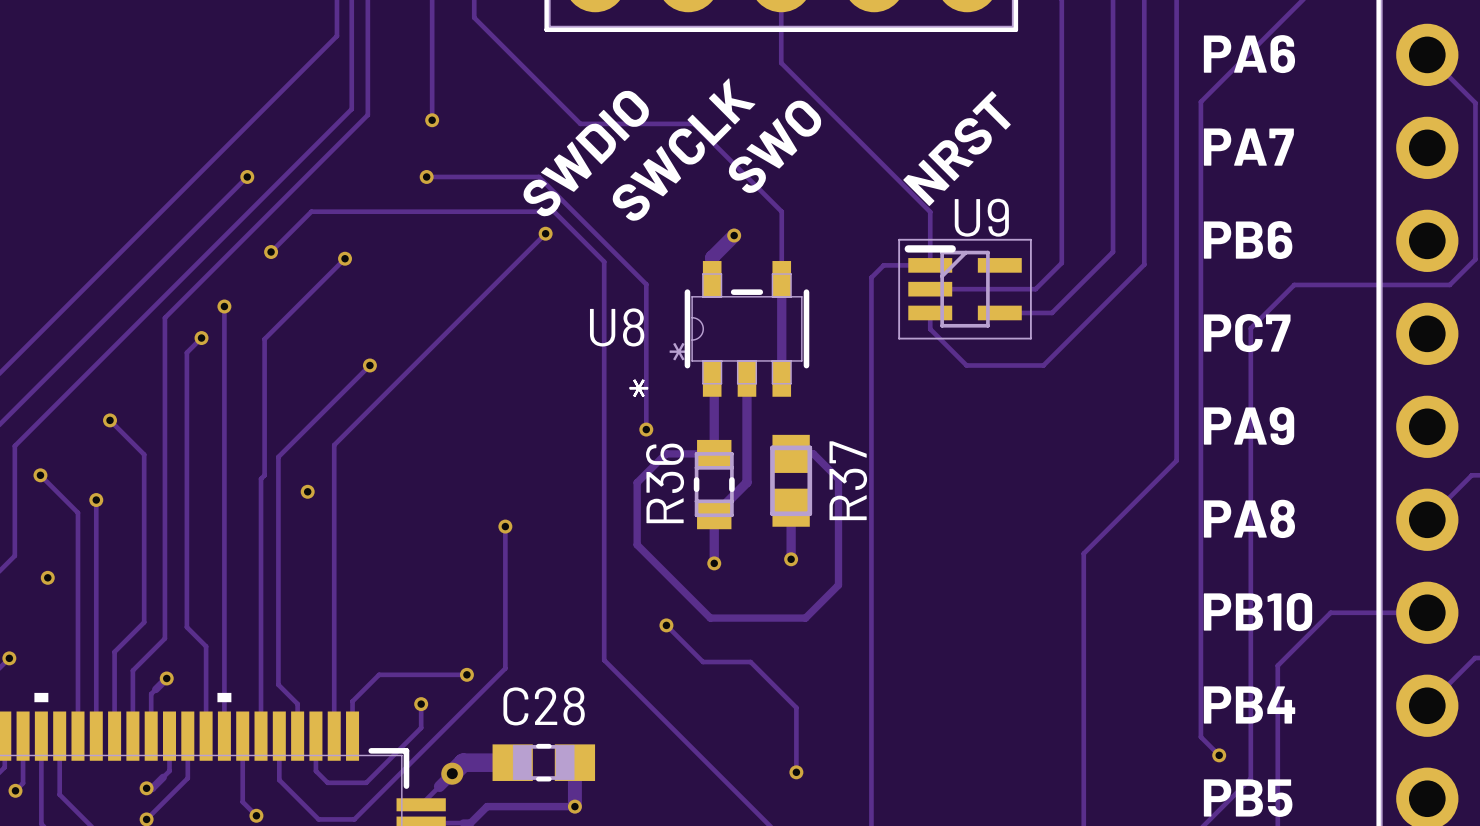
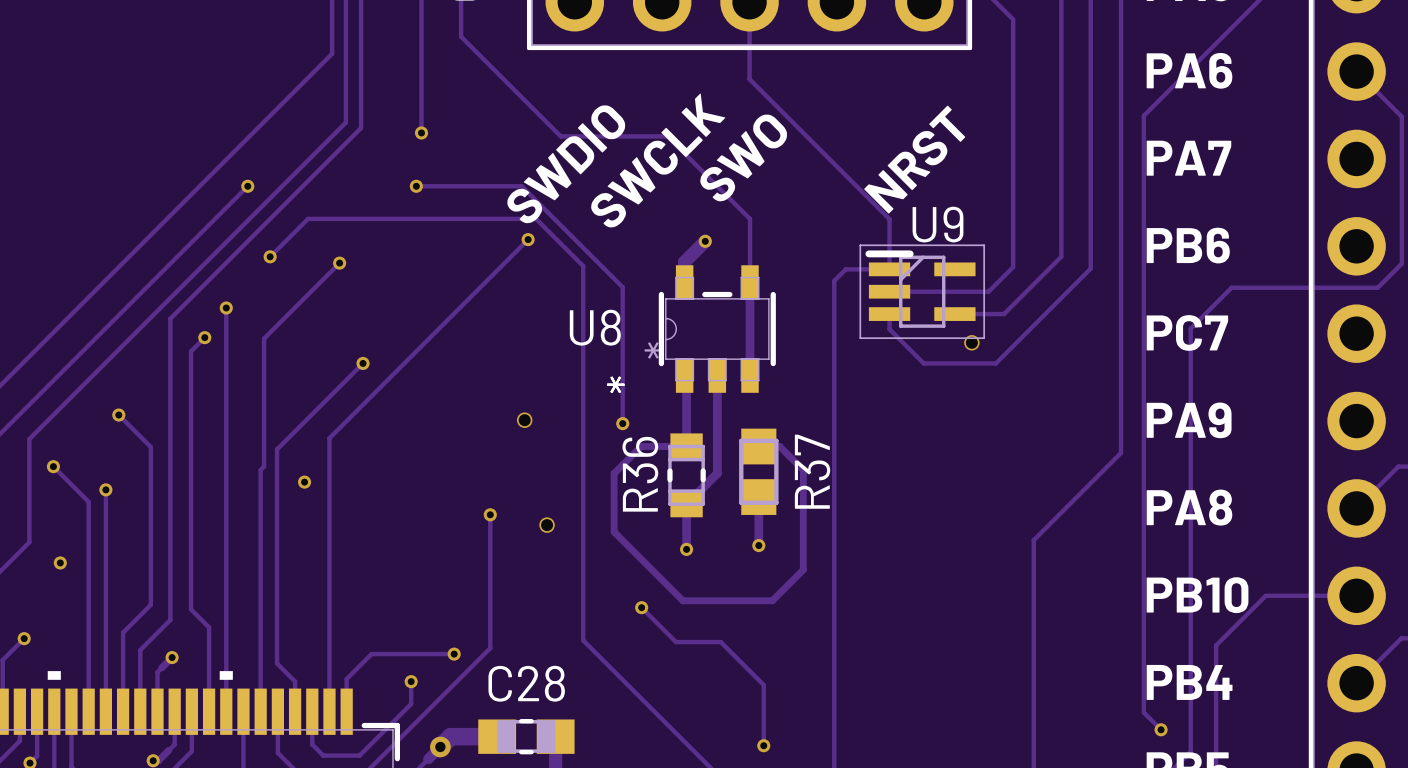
via: none -> (971, 342)
via: none -> (524, 420)
via: none -> (547, 525)

